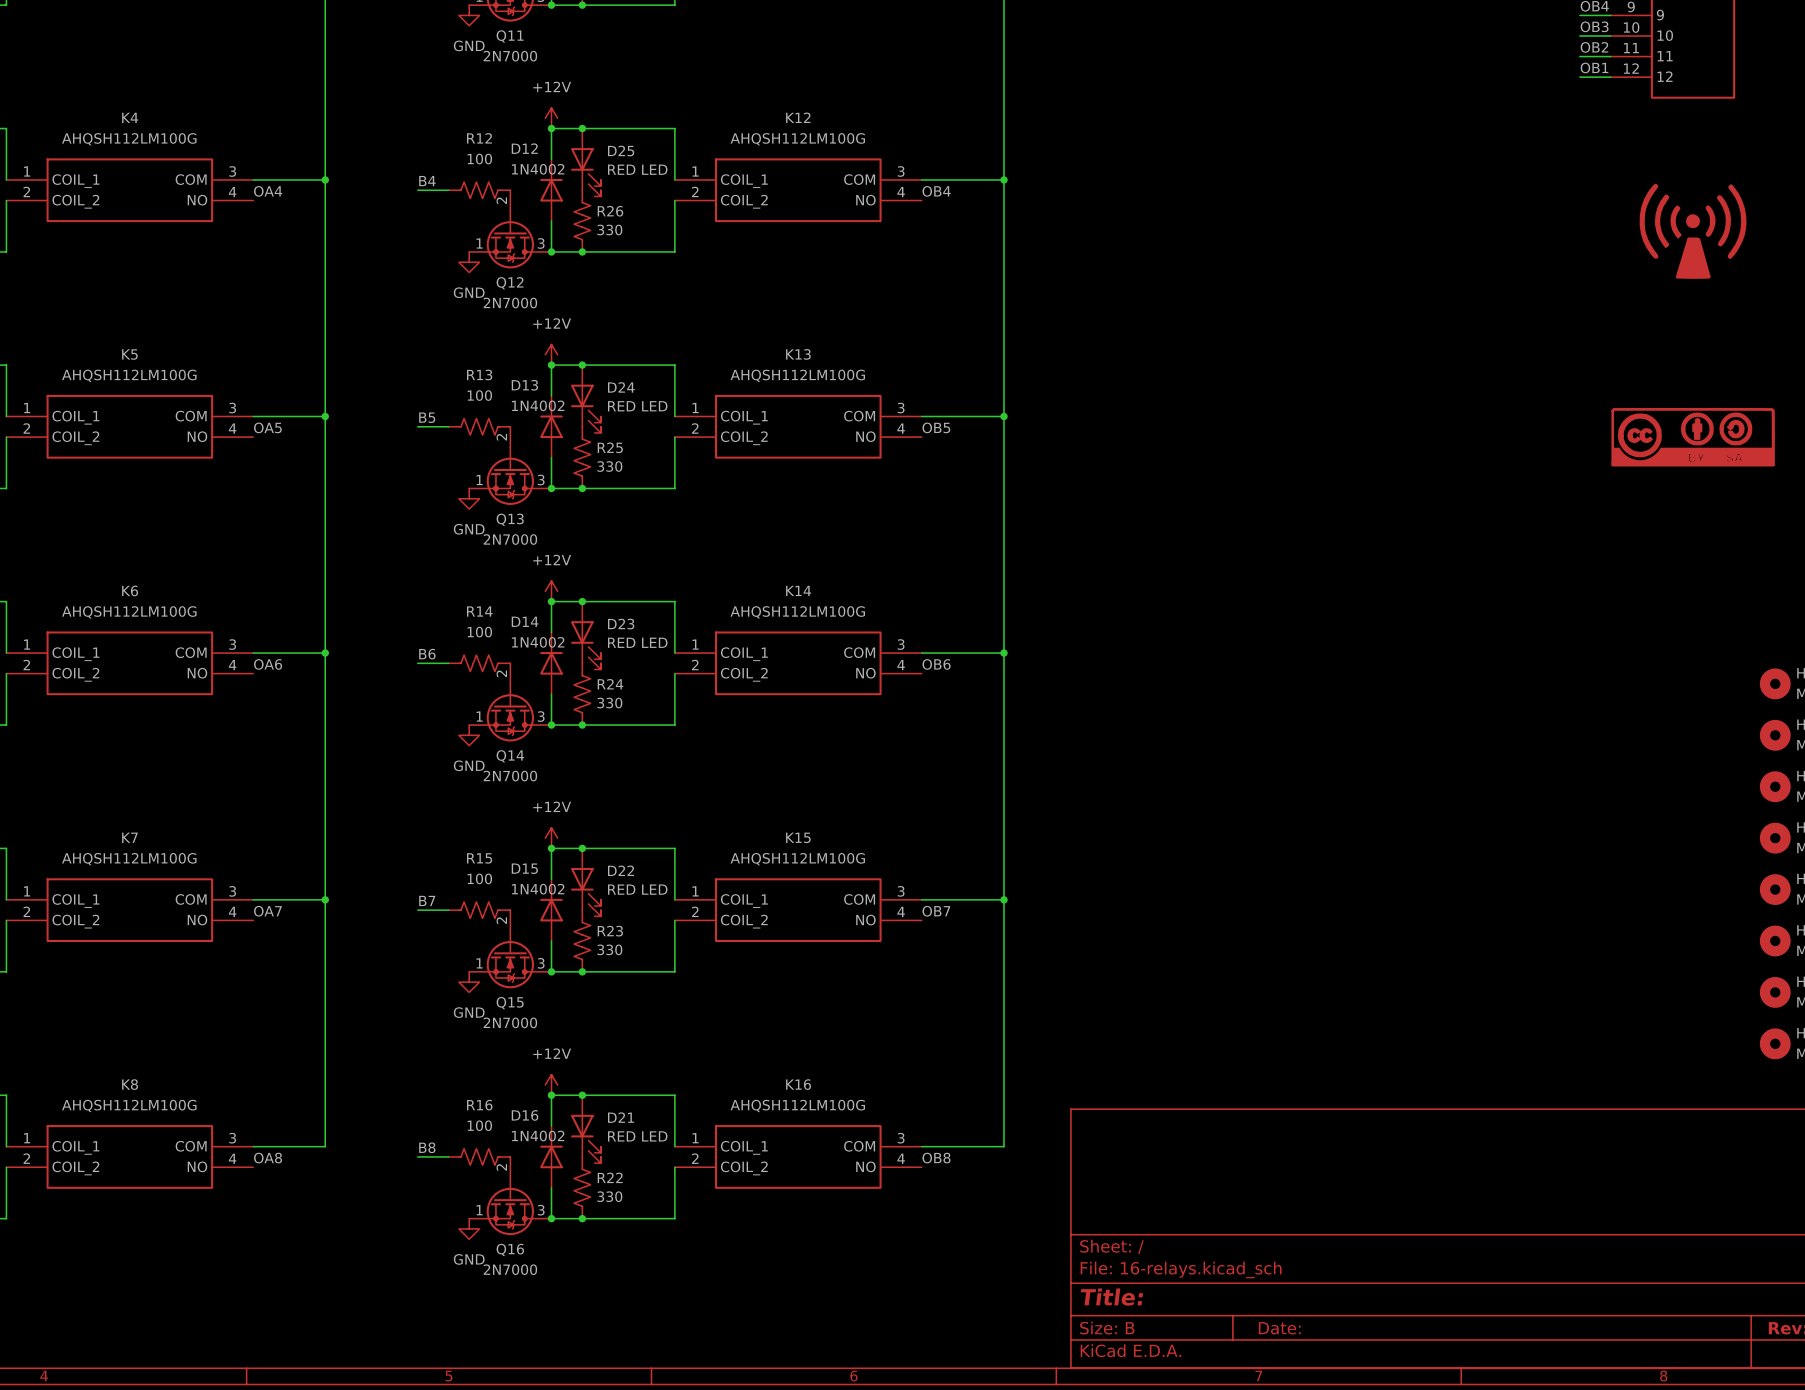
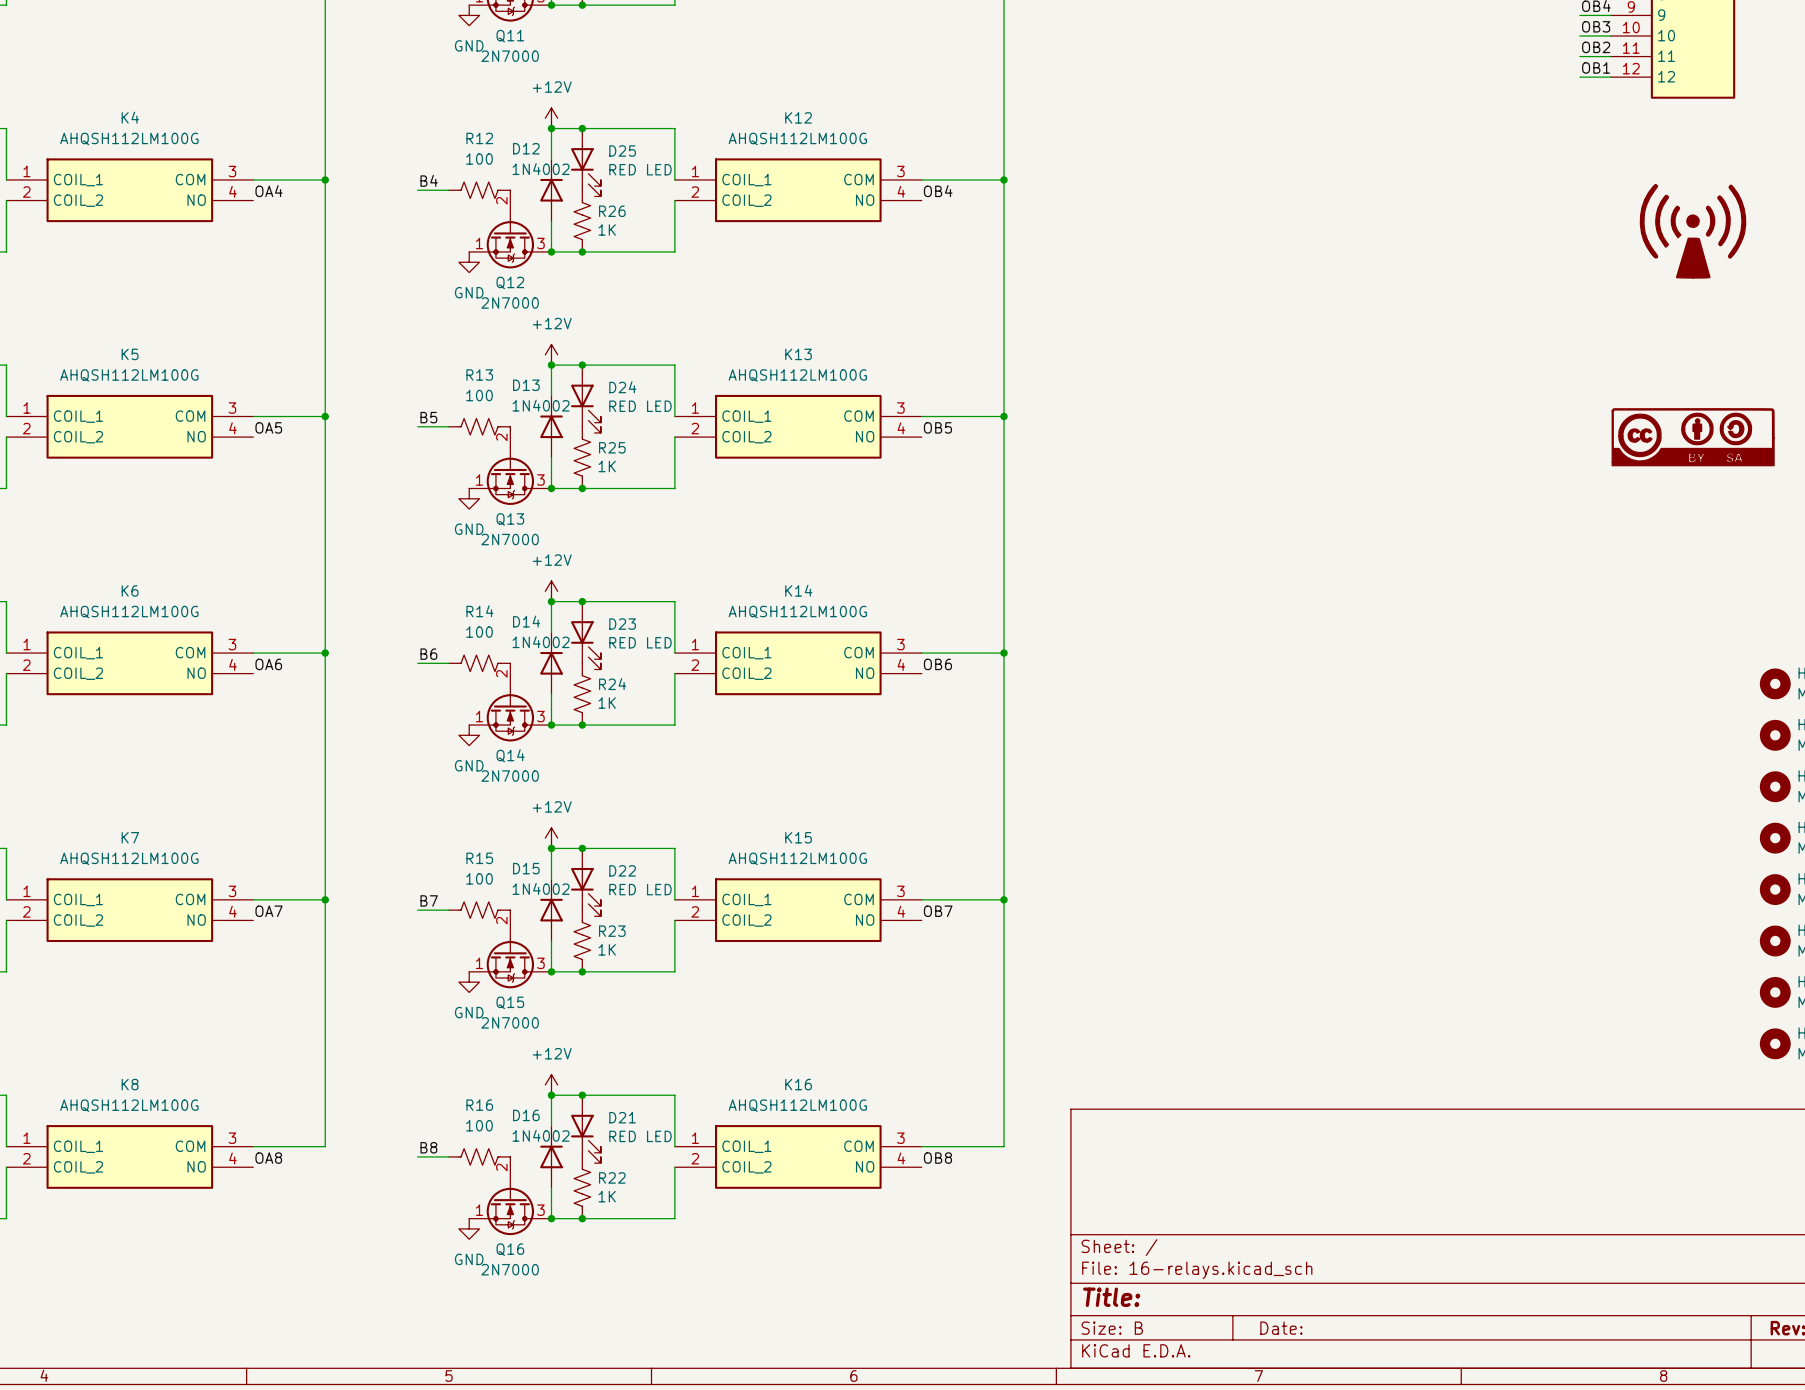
R26 value: 330 (609, 229) -> 1K (607, 229)
R25 value: 330 (609, 466) -> 1K (607, 466)
R24 value: 330 (609, 703) -> 1K (607, 703)
R23 value: 330 (609, 949) -> 1K (607, 949)
R22 value: 330 (609, 1196) -> 1K (607, 1196)

